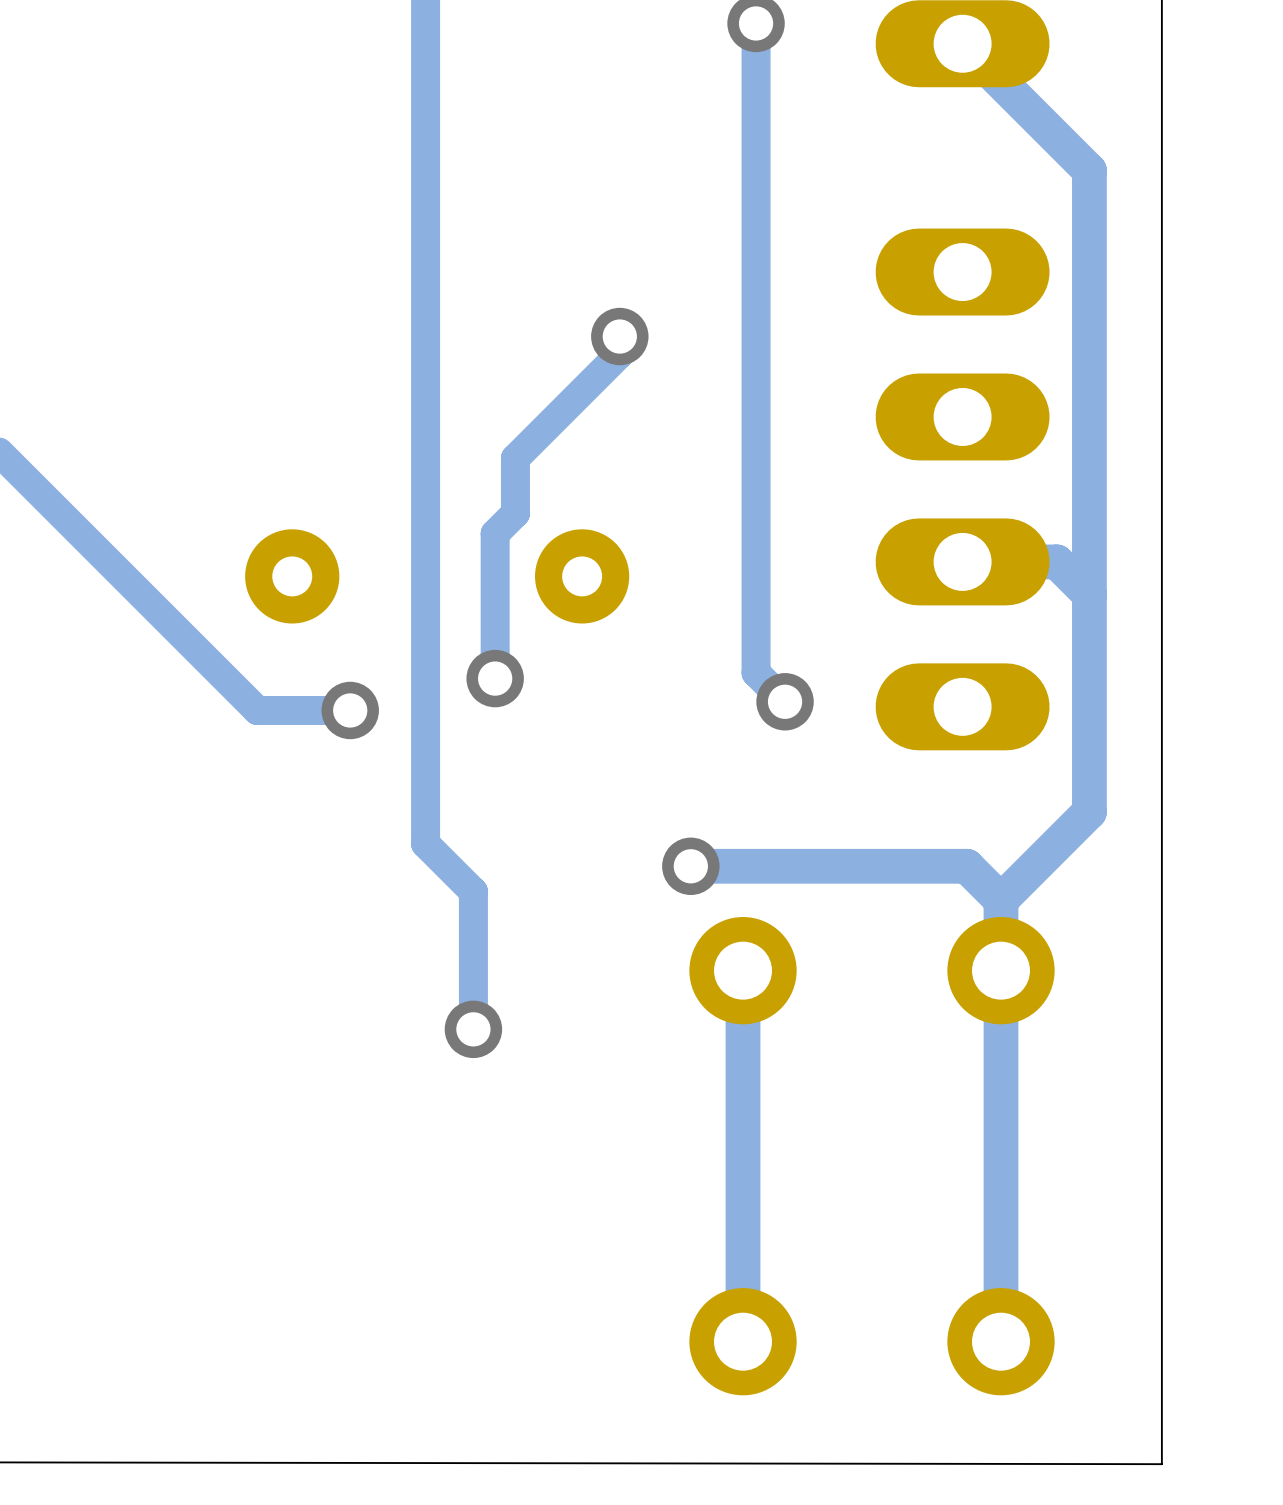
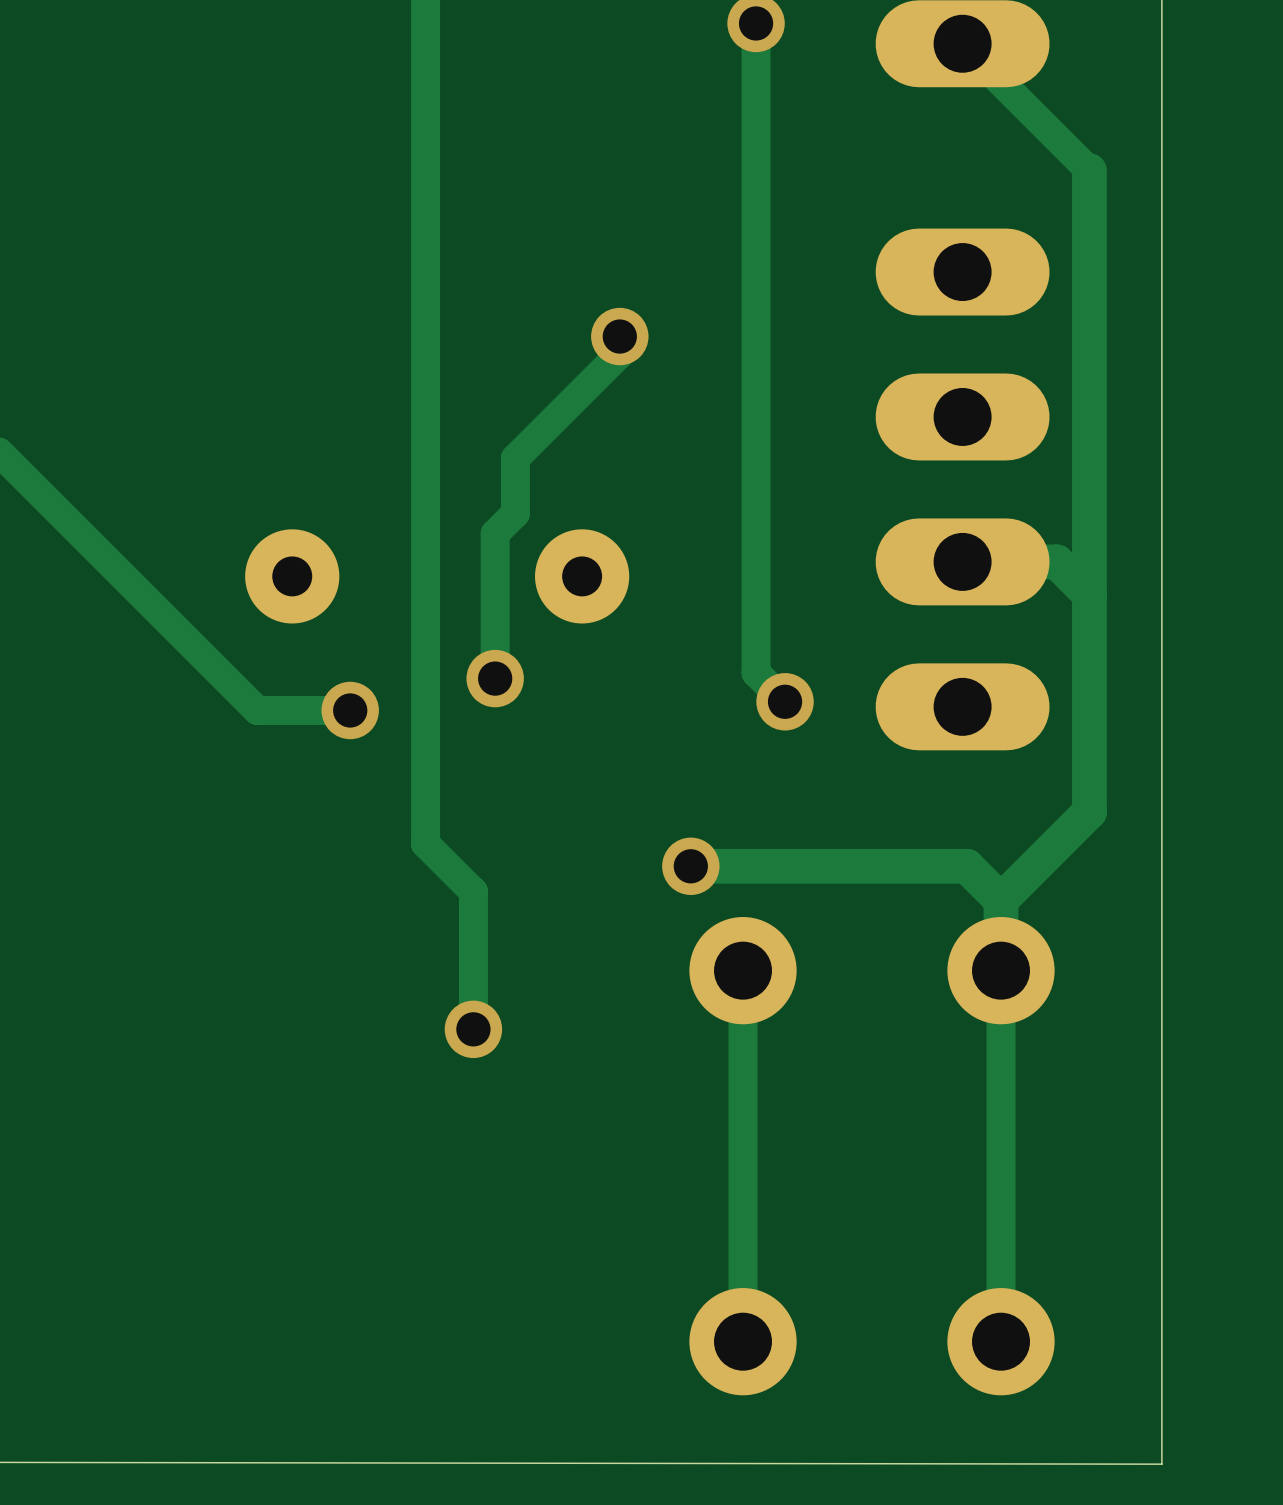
track width: thick (962, 43) (1089, 170) -> thin (962, 43) (1089, 170)
track width: thick (743, 970) (743, 1341) -> thin (743, 970) (743, 1341)
track width: thick (1001, 970) (1001, 1341) -> thin (1001, 970) (1001, 1341)

